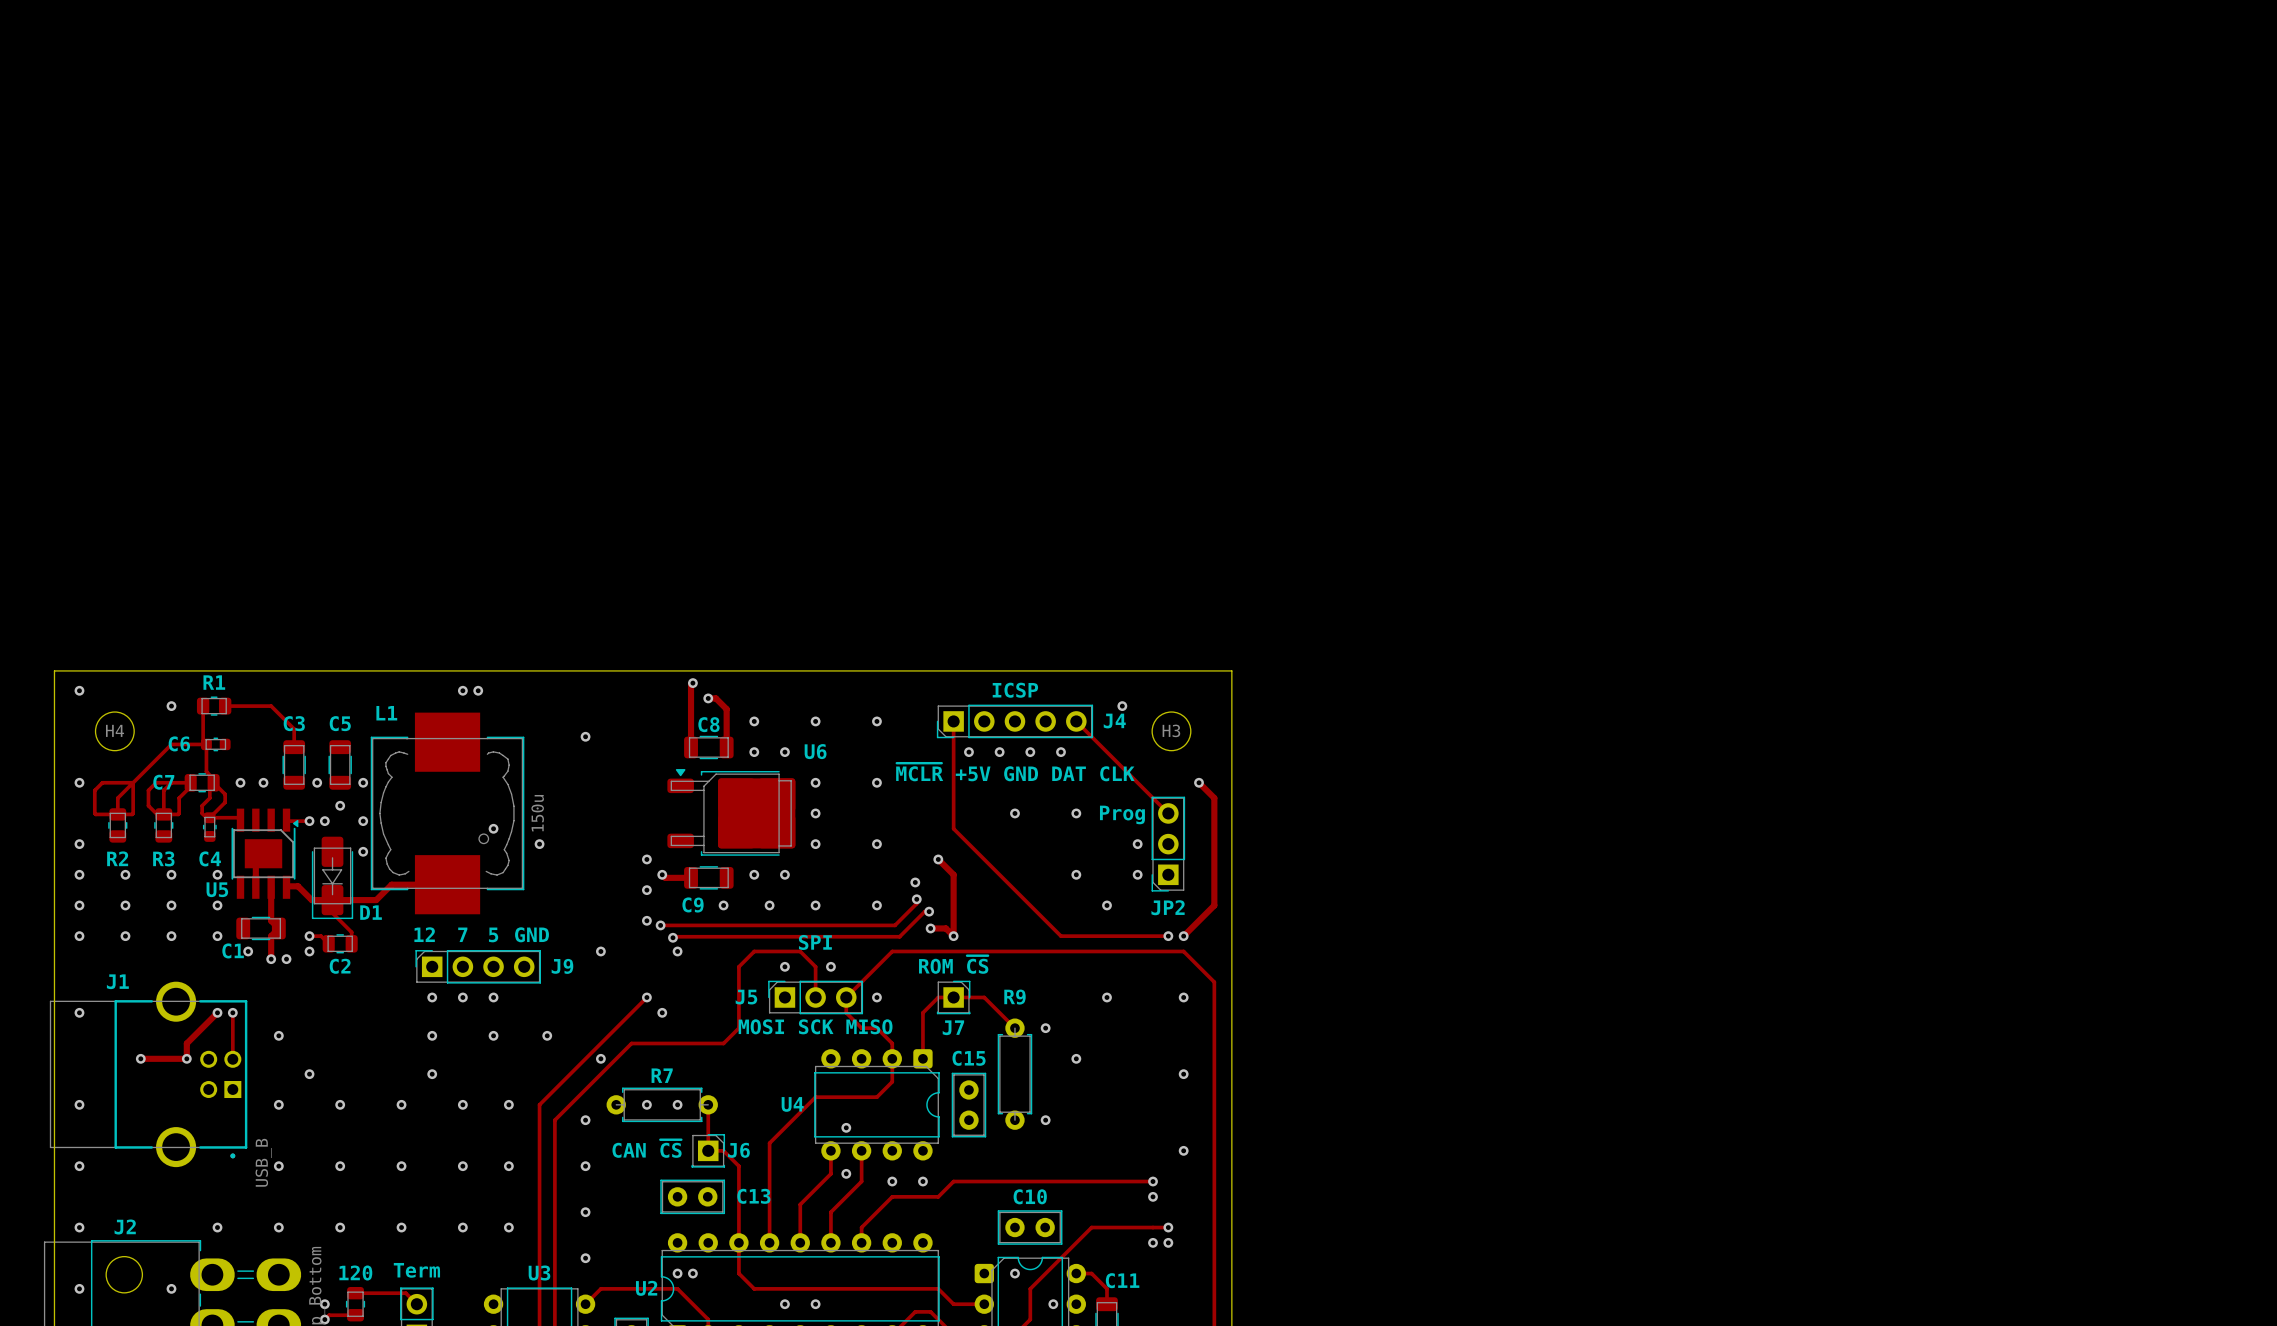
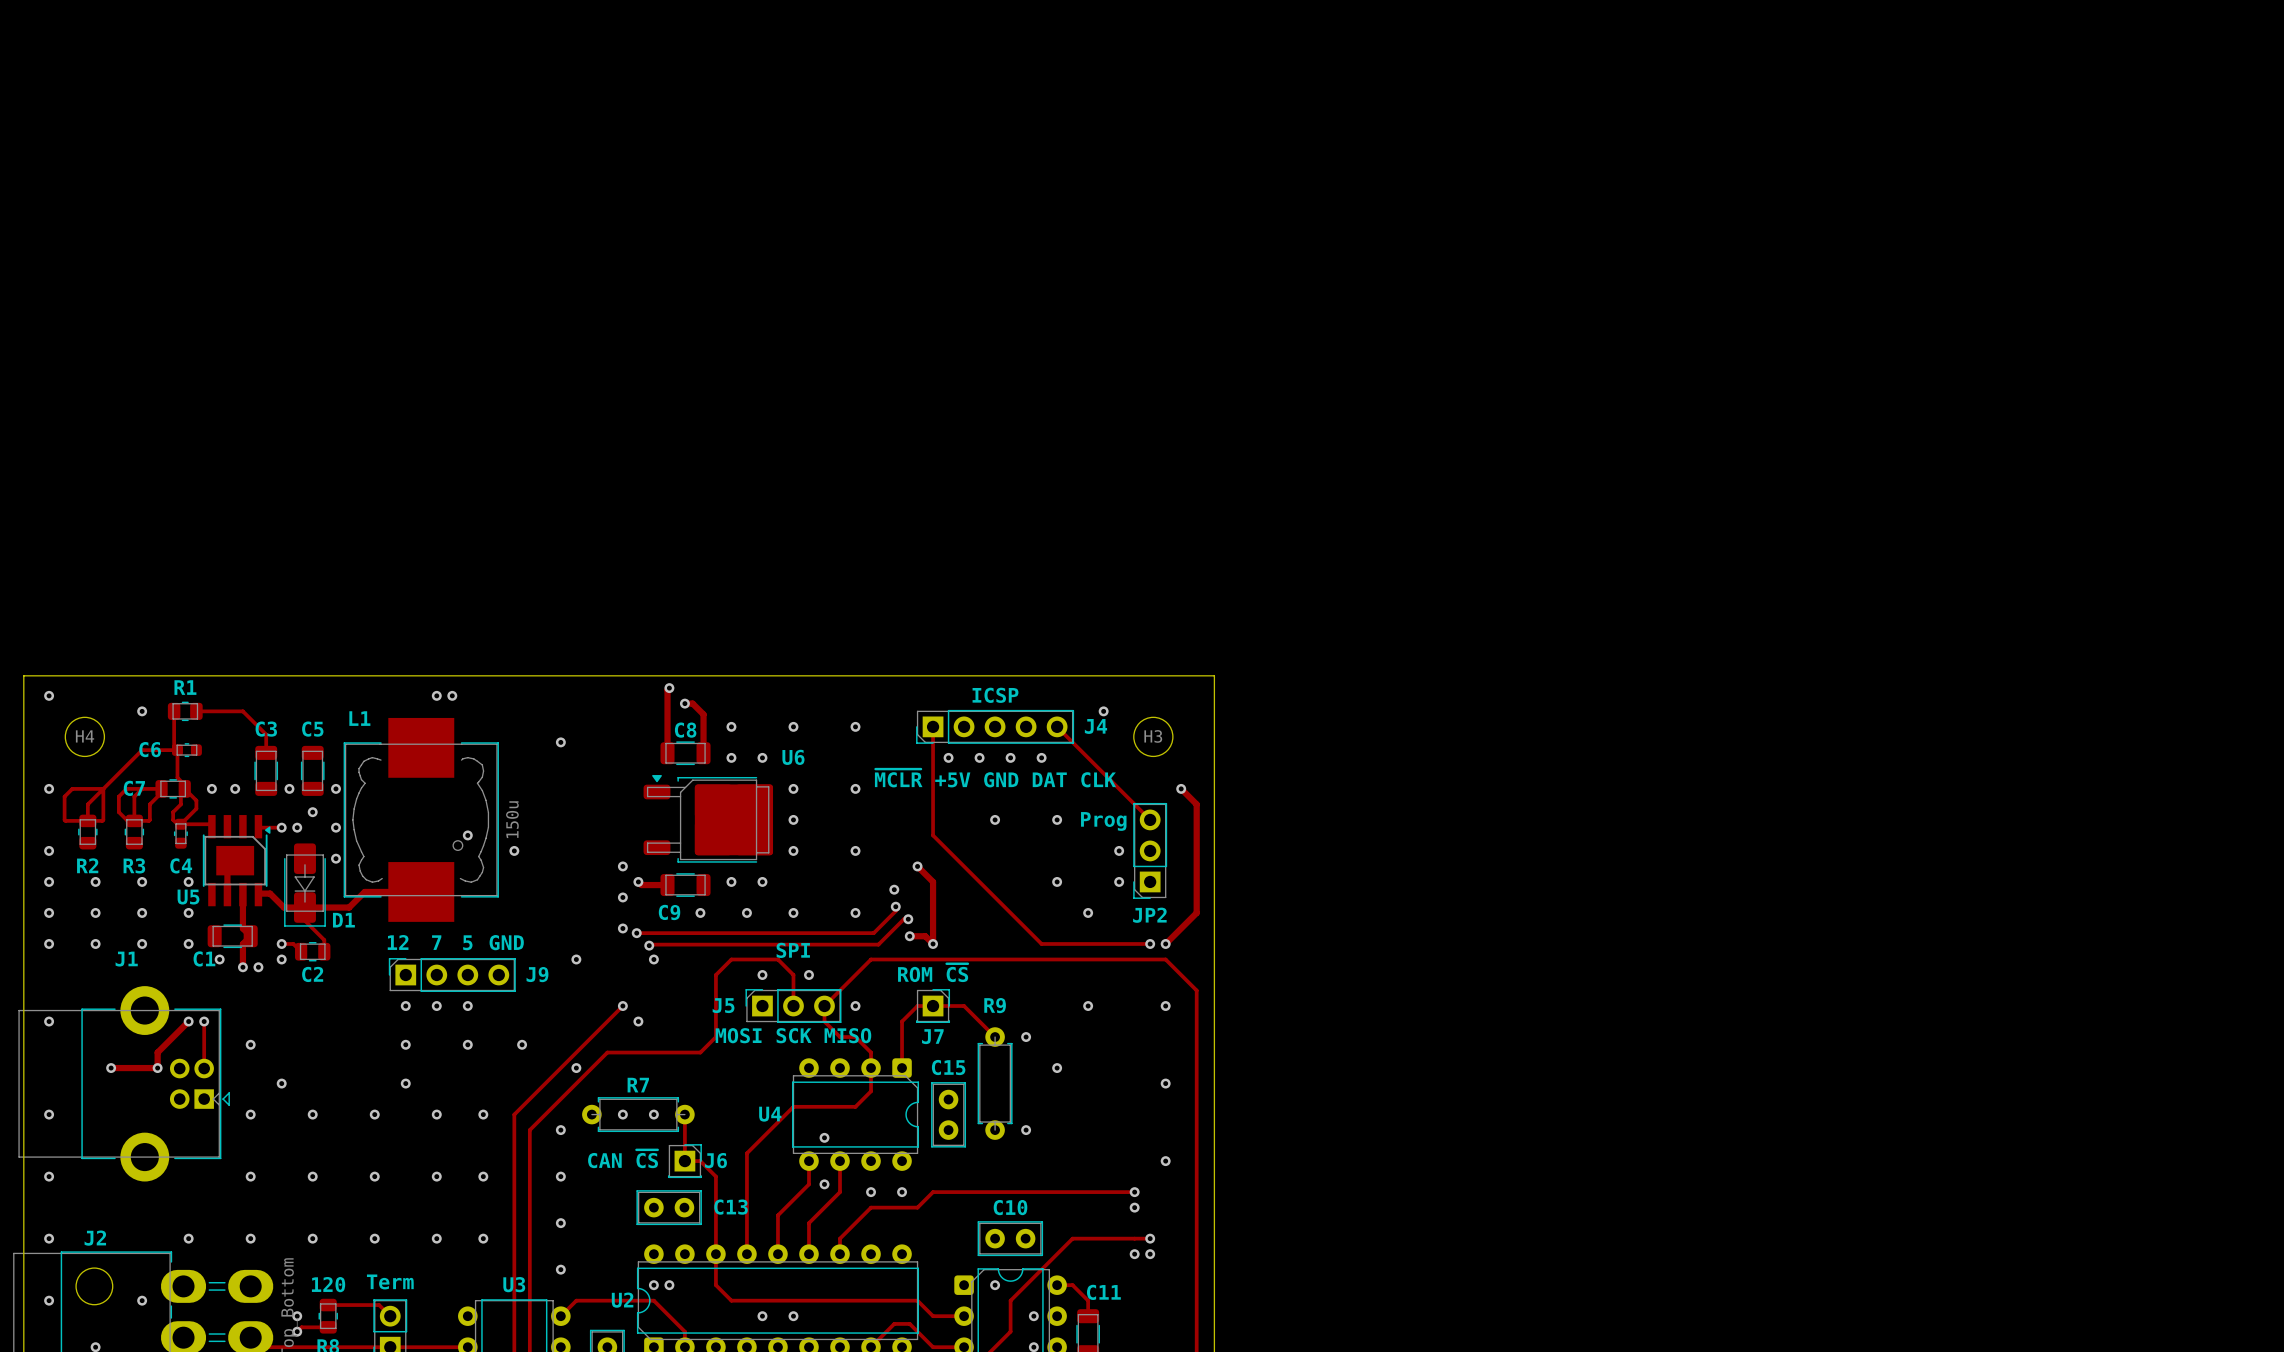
J1 footprint: [49, 981, 248, 1168] -> [18, 986, 230, 1182]
J1 name position: J1 (117, 981) -> J1 (126, 959)
J1 value: USB_B (263, 1162) -> none

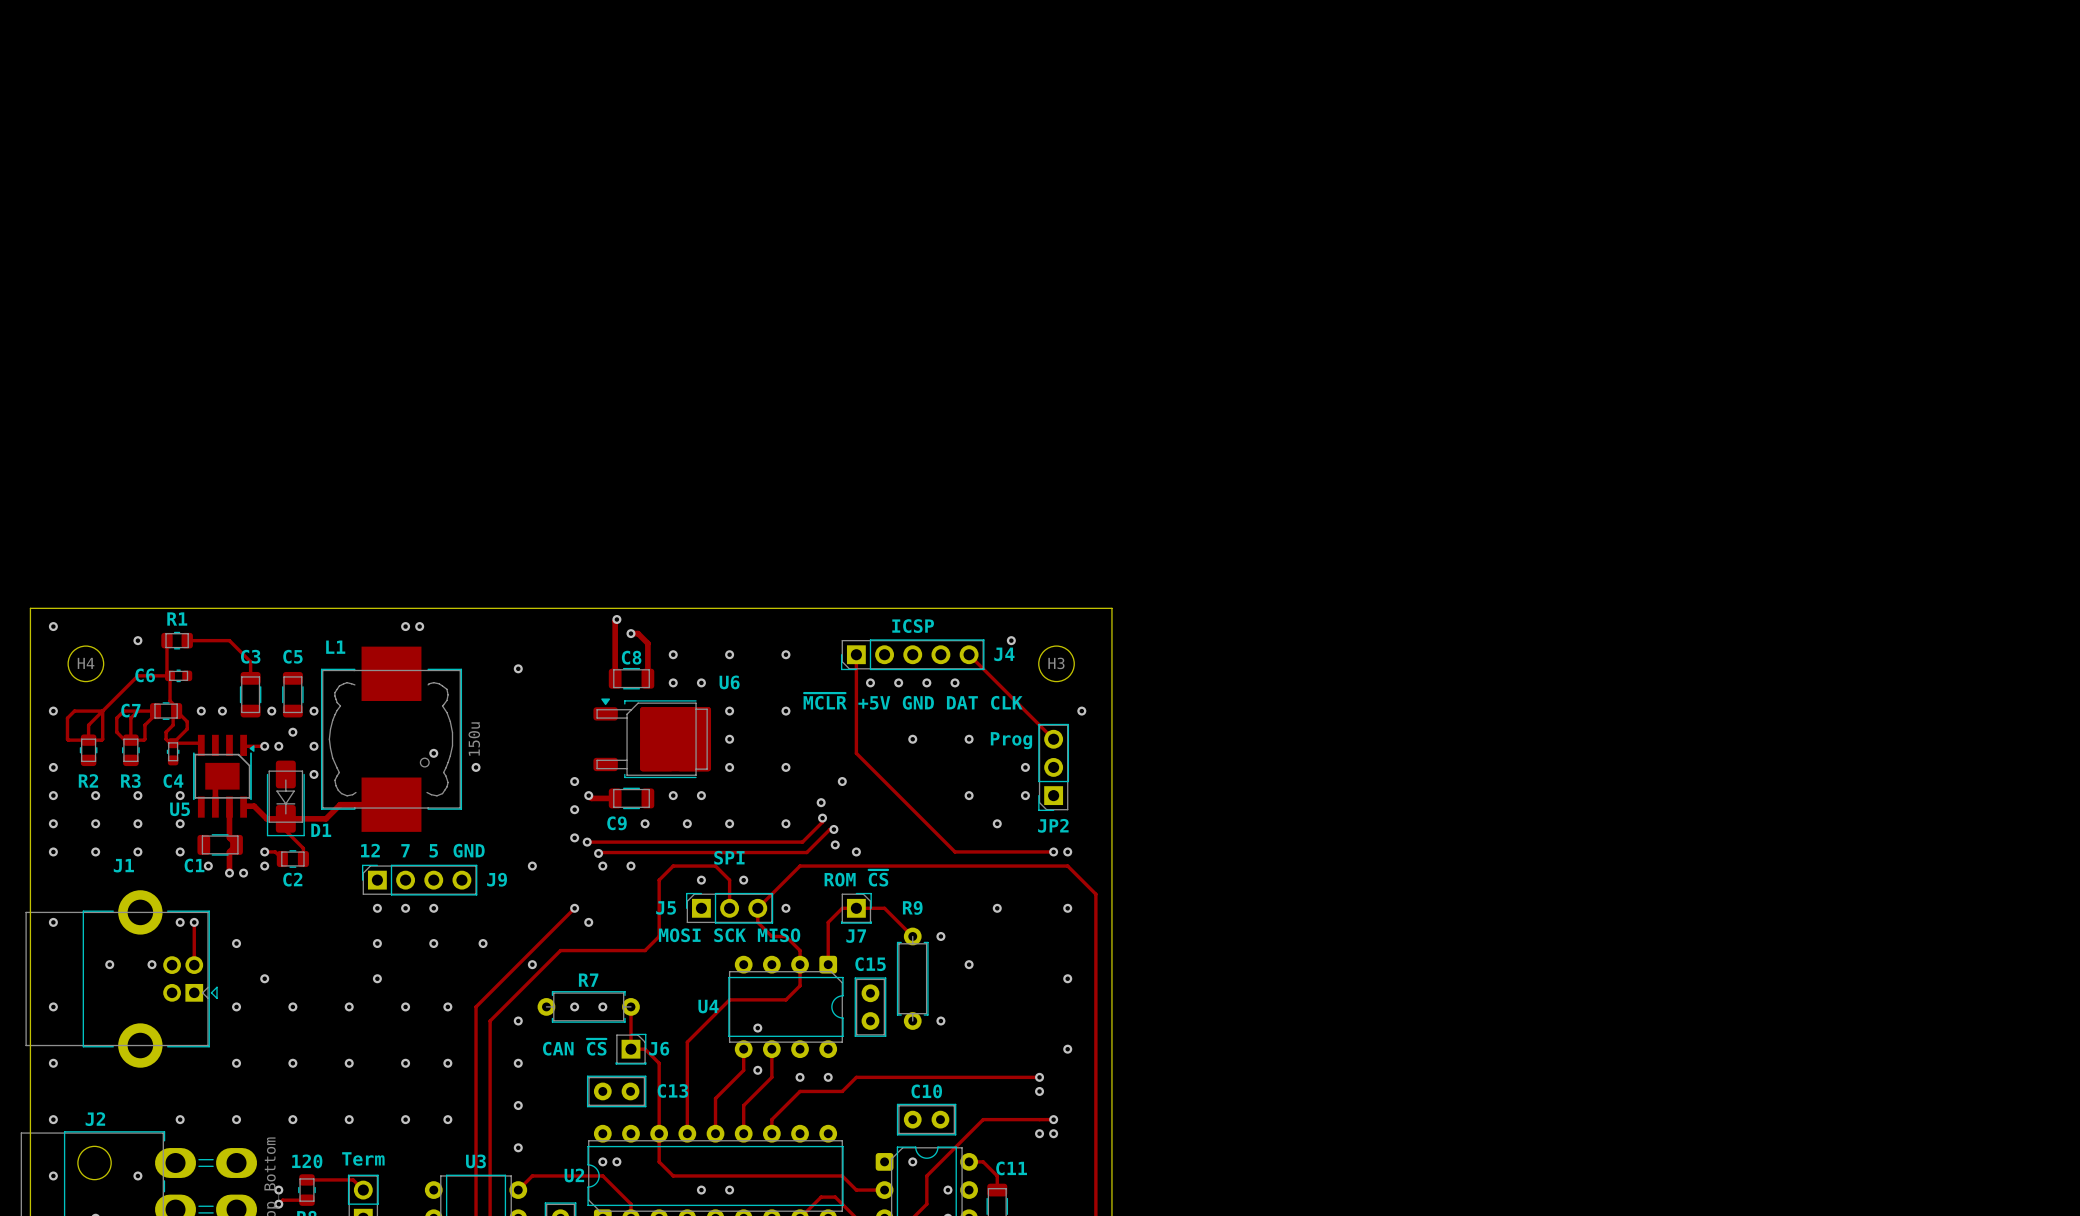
track: (1181, 788) (1196, 804) (1196, 912) (1165, 943) -> none
track: (917, 866) (933, 881) (933, 943) (925, 936) (909, 936) -> none
via: none -> (630, 866)
track: (188, 1021) (157, 1052) (157, 1068) (111, 1068) -> none

